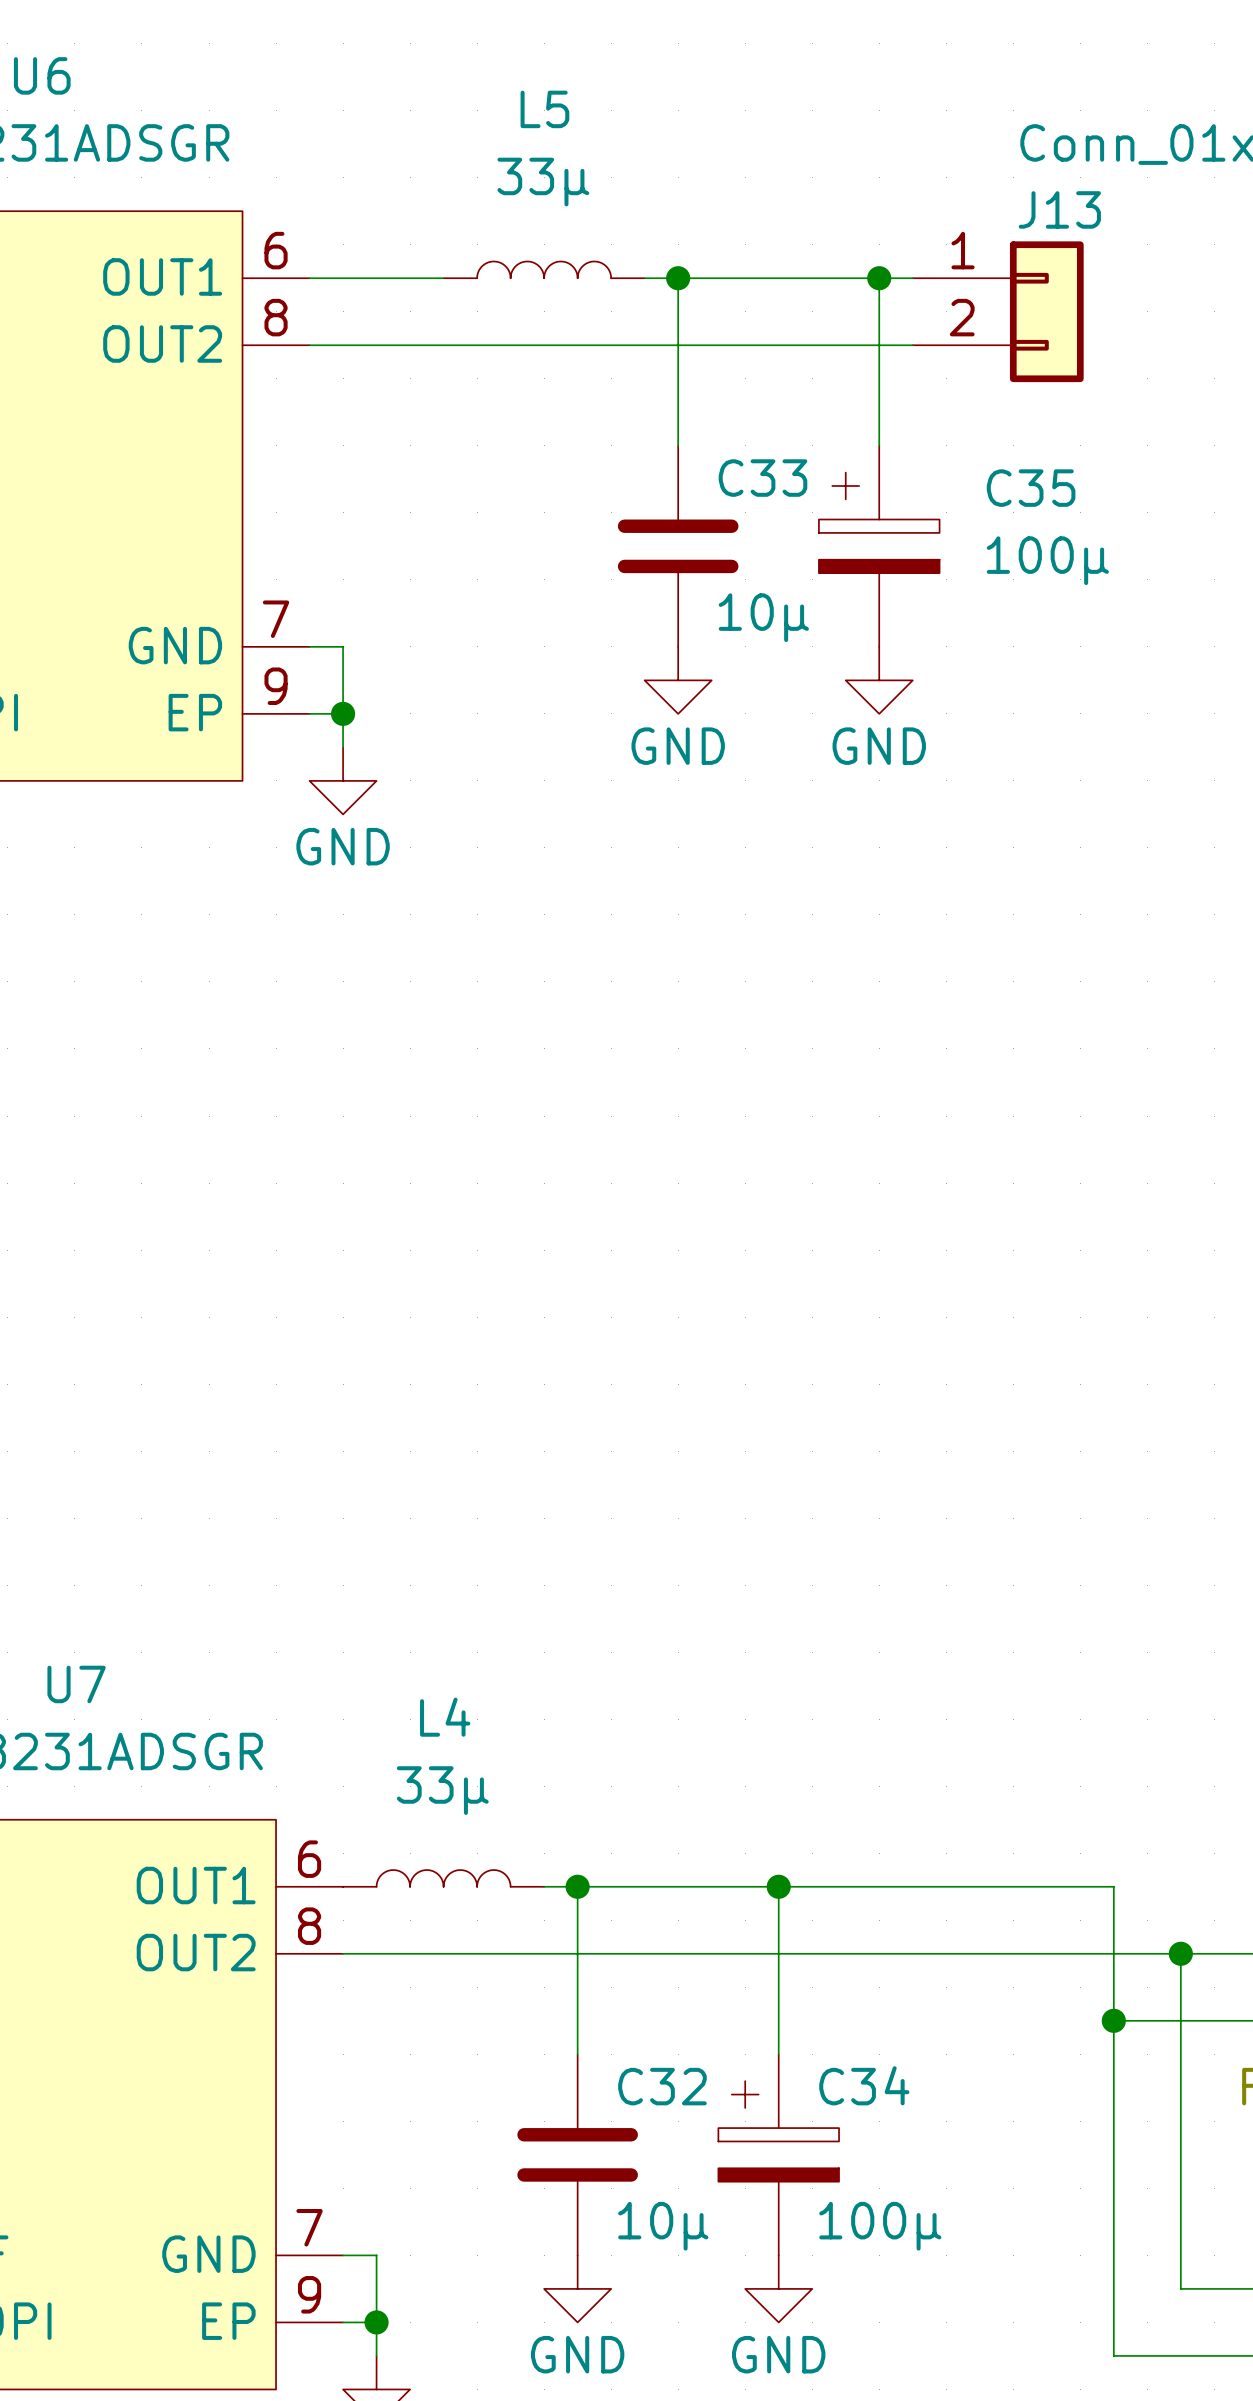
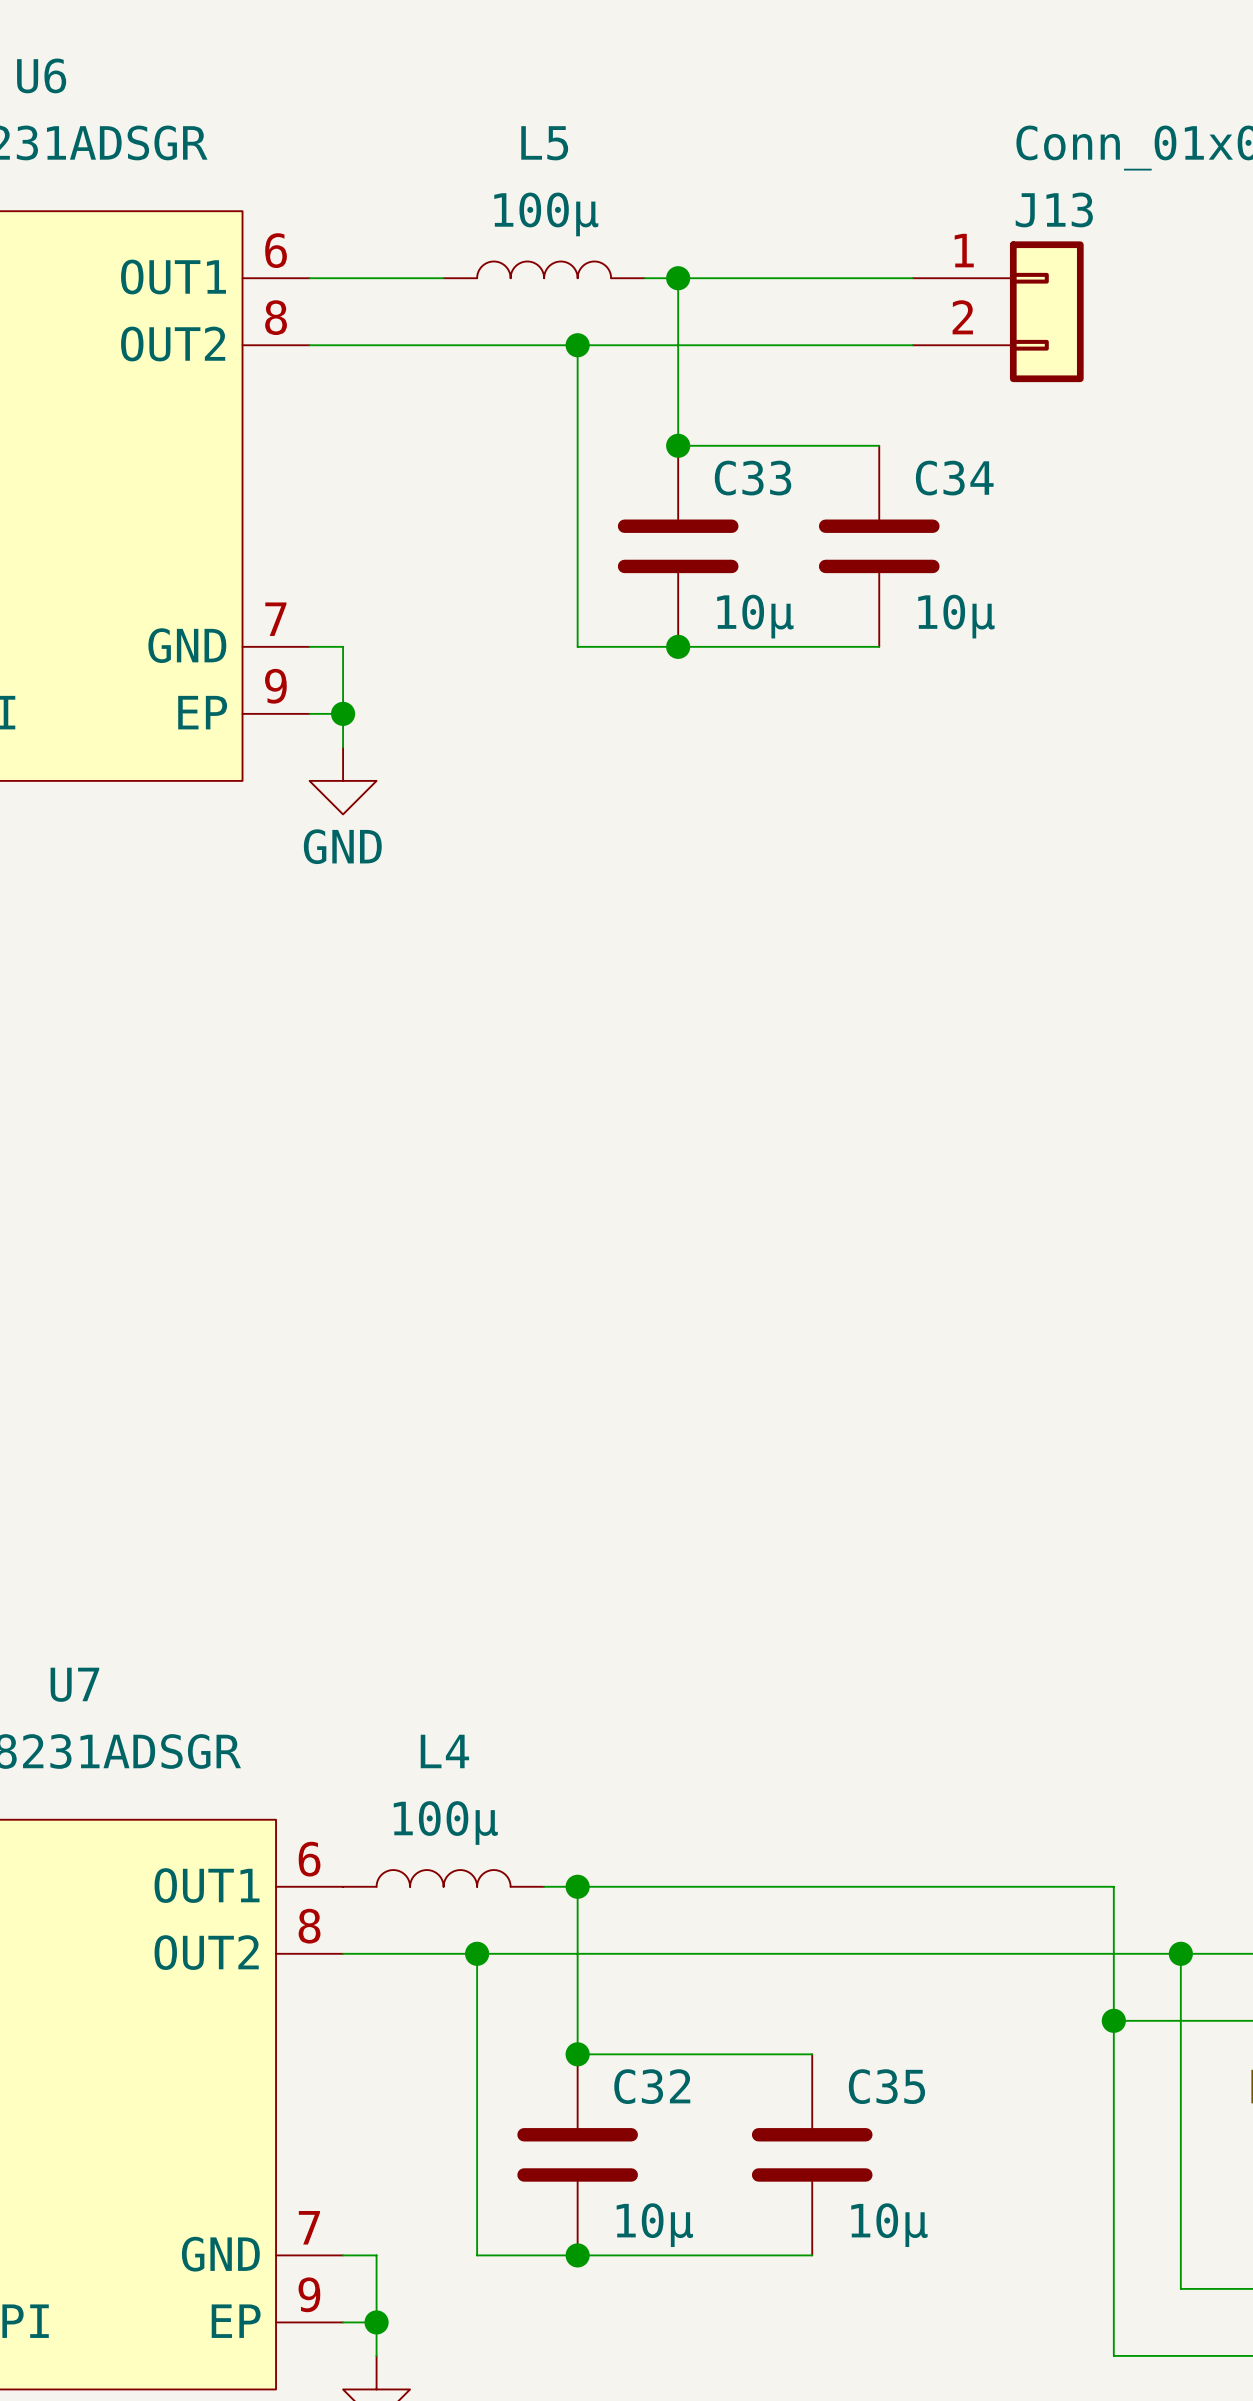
L5 name position: L5 (544, 109) -> L5 (544, 143)
L5 value: 33µ (543, 182) -> 100µ (546, 214)
wire: (879, 278) (879, 445) -> (678, 445) (879, 445)
junction: (879, 278) -> none
wire: none -> (577, 345) (577, 646) (879, 646)
junction: none -> (577, 345)
junction: none -> (678, 445)
C35 symbol: [818, 445, 940, 647] -> [751, 2054, 873, 2256]
C35 name position: C35 (1031, 488) -> C35 (886, 2086)
C35 value: 100µ (1047, 560) -> 10µ (889, 2225)
junction: none -> (678, 646)
power symbol: GND (678, 680) -> none
power symbol: GND (879, 680) -> none
L4 name position: L4 (445, 1717) -> L4 (444, 1751)
L4 value: 33µ (442, 1790) -> 100µ (445, 1823)
wire: (778, 1886) (778, 2054) -> none
junction: (778, 1886) -> none
wire: none -> (477, 1953) (477, 2255) (812, 2255)
junction: none -> (477, 1953)
wire: none -> (577, 2054) (812, 2054)
junction: none -> (577, 2054)
C34 symbol: [718, 2054, 840, 2256] -> [818, 445, 940, 647]
C34 value: 100µ (880, 2226) -> 10µ (956, 616)
junction: none -> (577, 2255)
power symbol: GND (577, 2288) -> none
power symbol: GND (778, 2288) -> none

